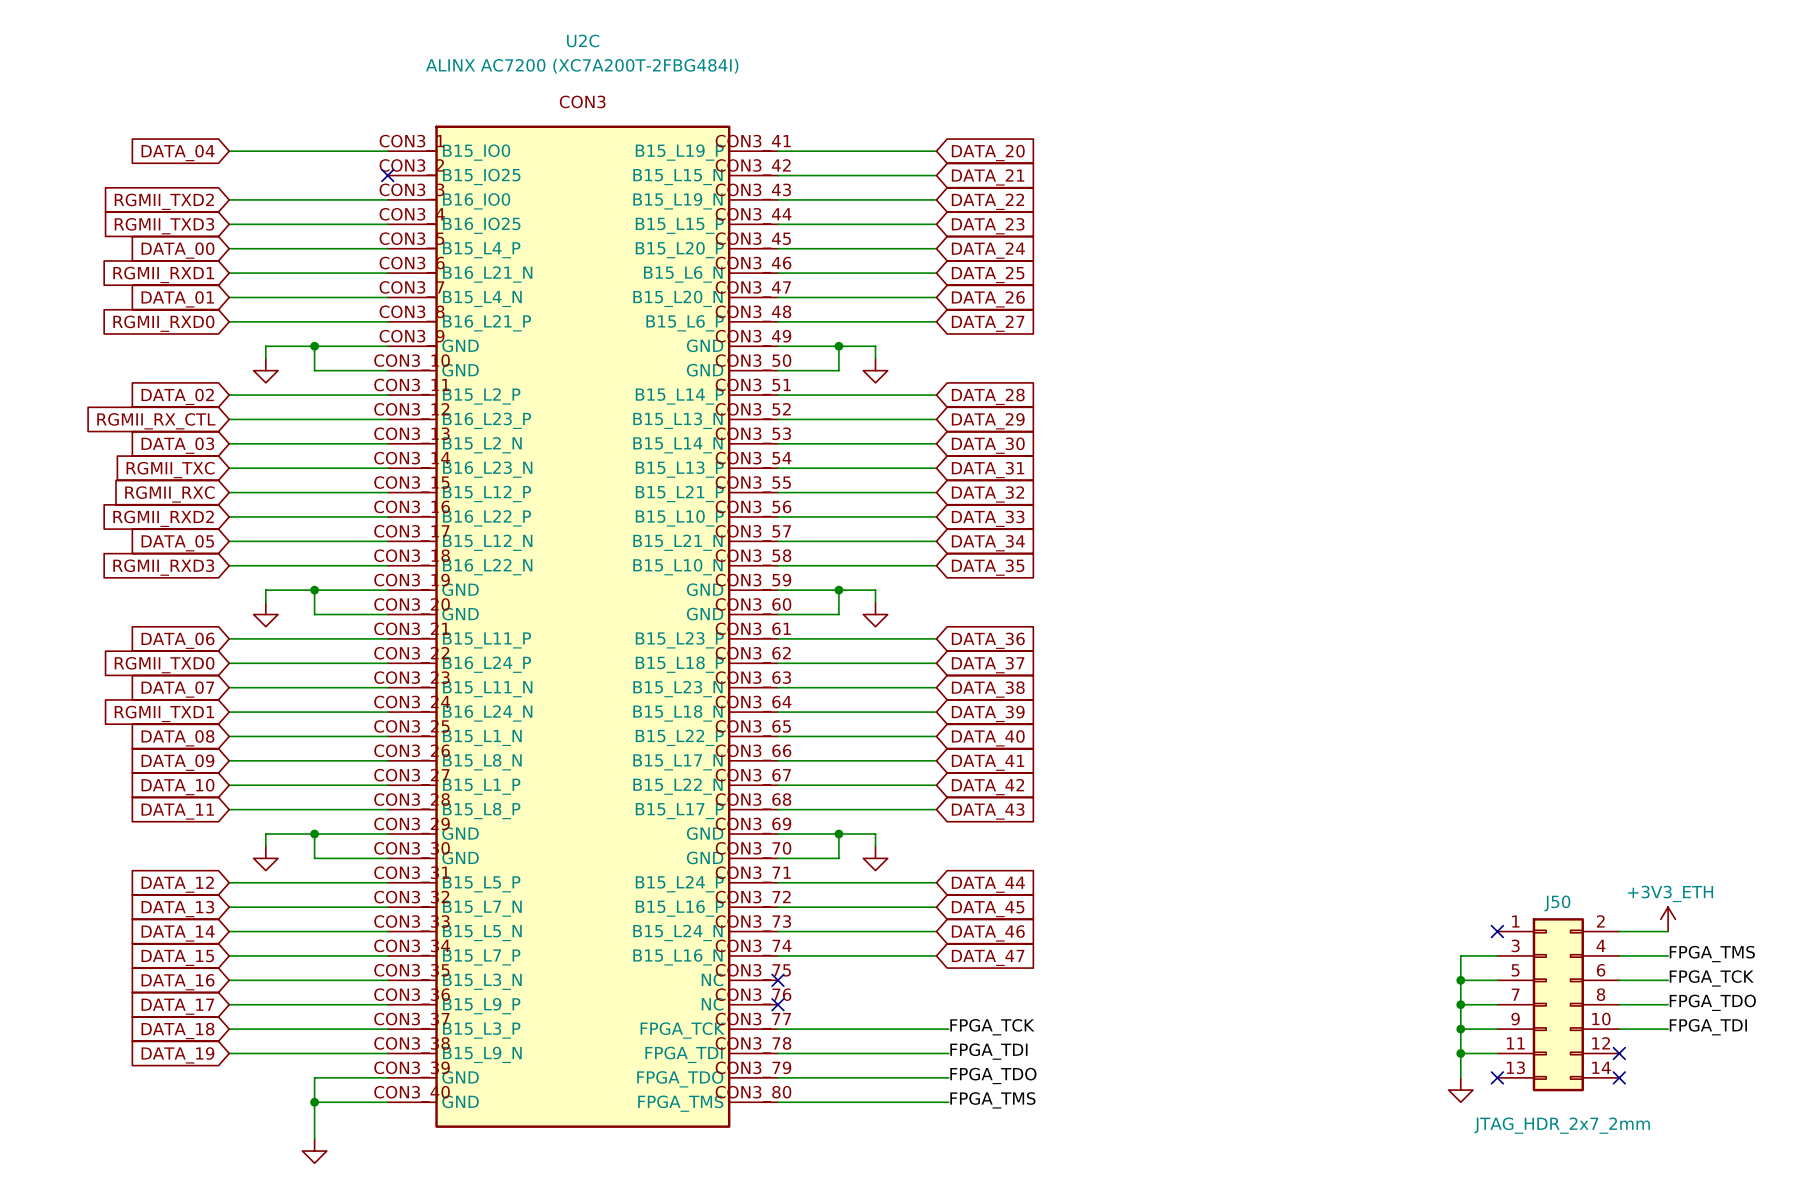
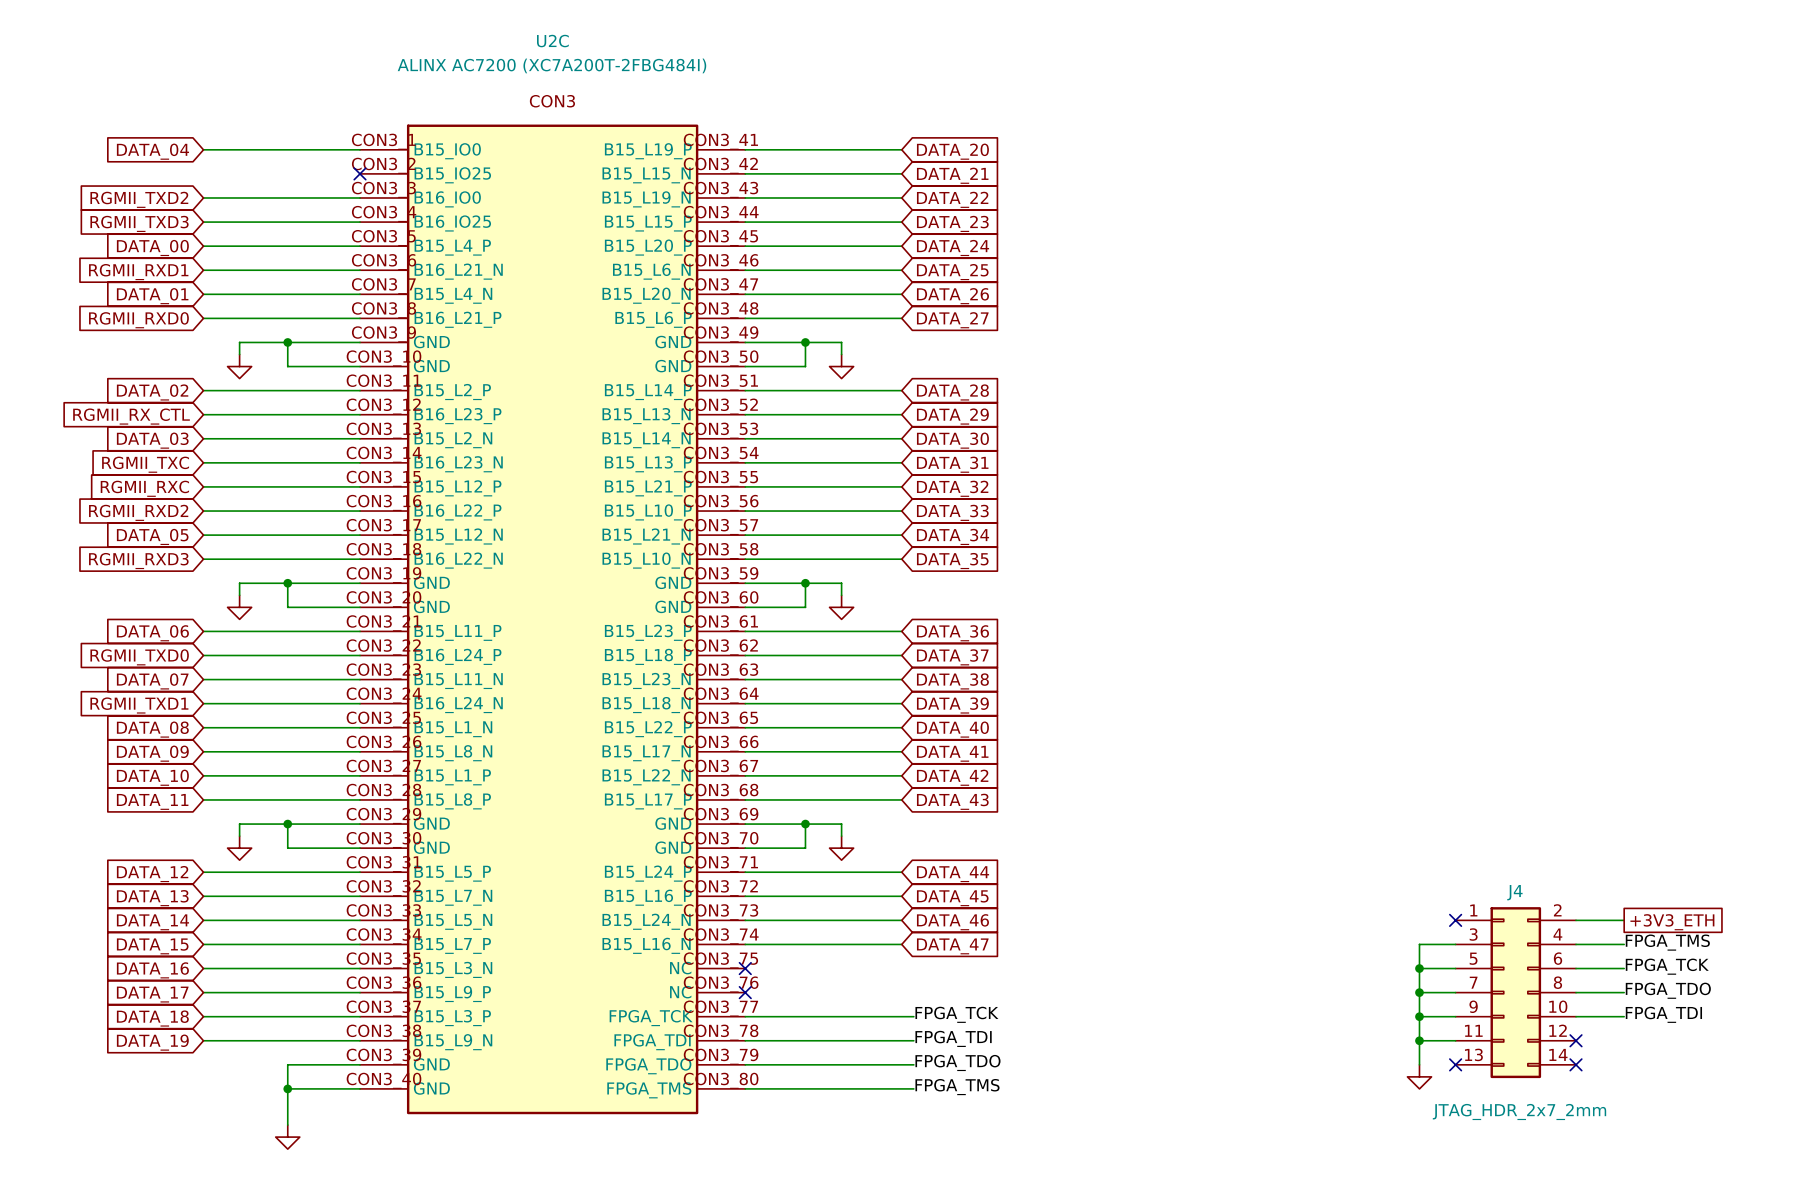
J50 name: J50 (1557, 903) -> J4 (1514, 892)
power symbol: +3V3_ETH (1668, 919) -> none
global label: none -> +3V3_ETH (1672, 922)

